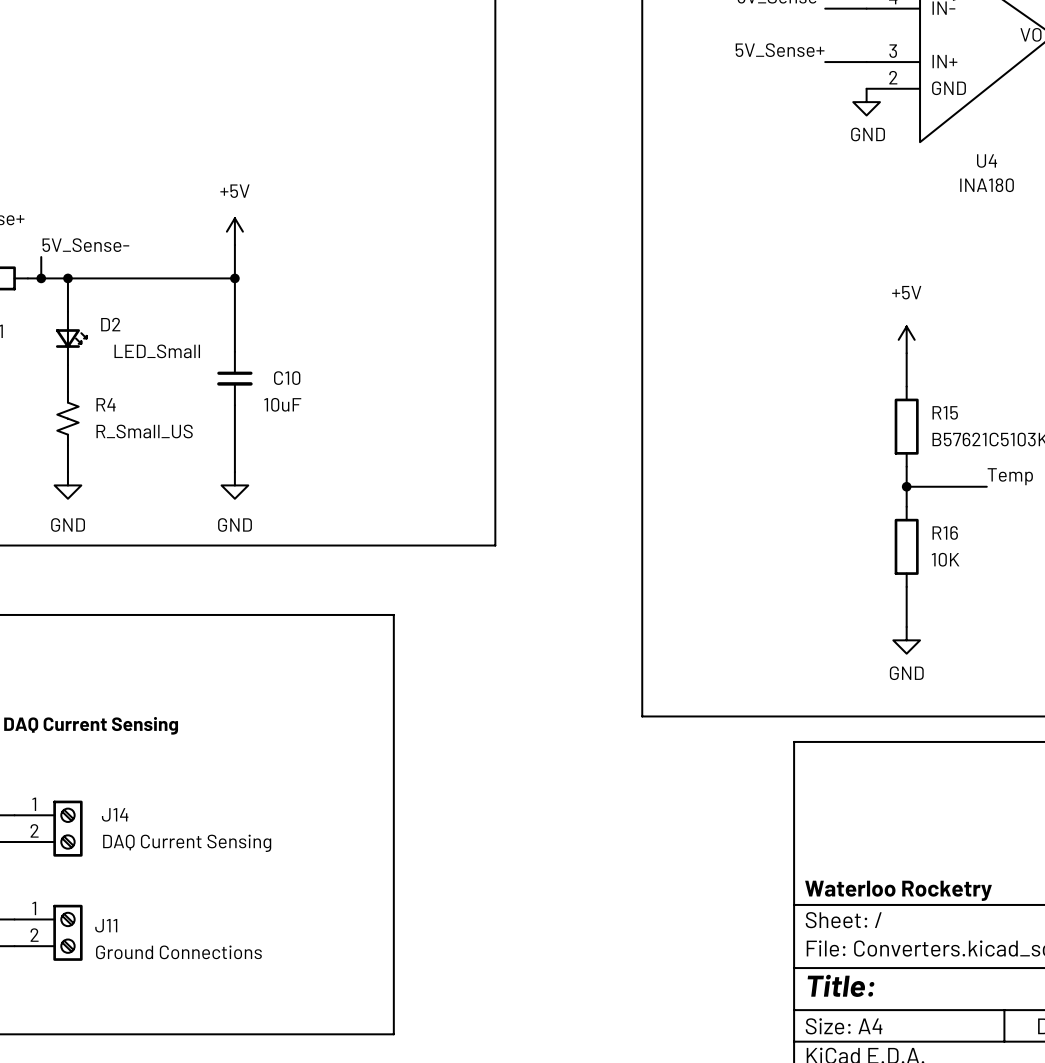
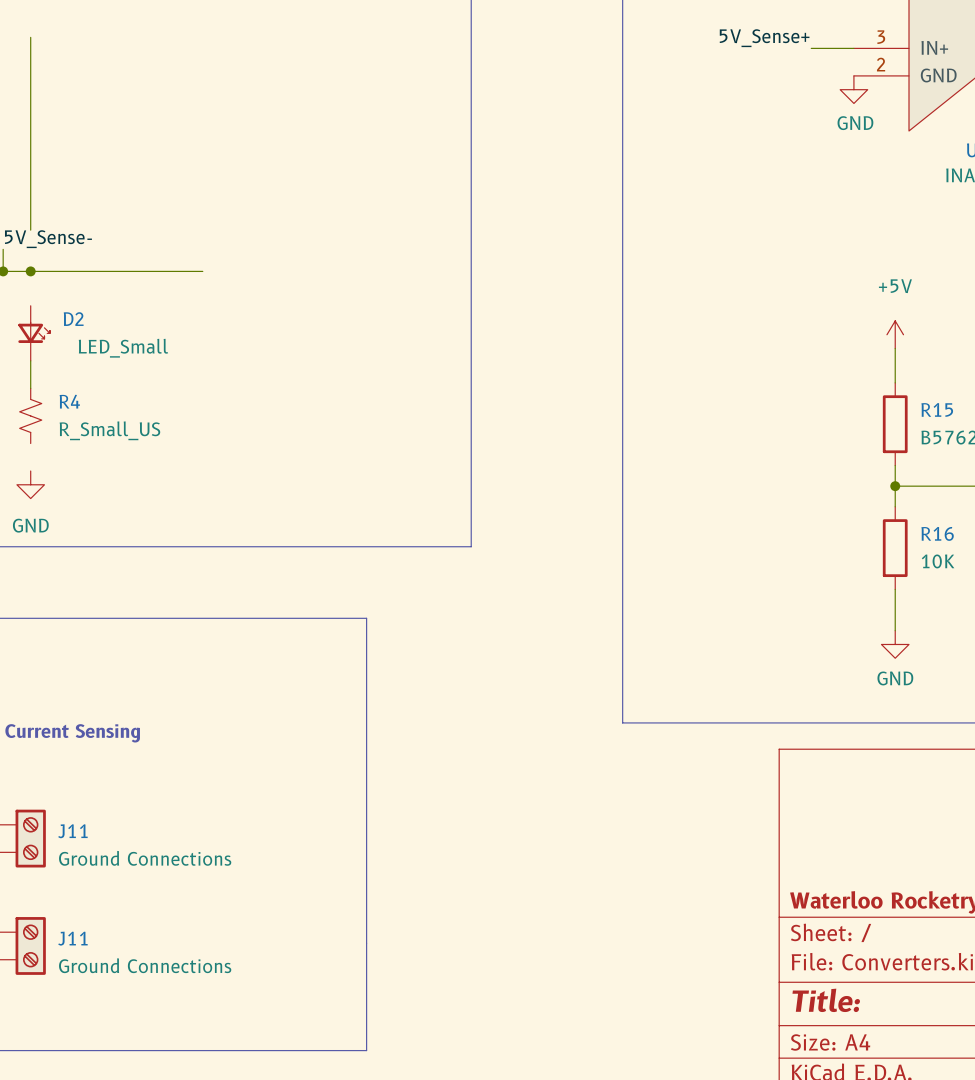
wire: none -> (30, 37) (30, 230)
power symbol: +5V (234, 231) -> none
wire: (234, 245) (234, 351) -> none
wire: (67, 278) (67, 311) -> none
junction: (234, 278) -> none
C10: 10uF (234, 378) -> none
wire: (234, 405) (234, 472) -> none
wire: (67, 445) (67, 472) -> none
power symbol: GND (234, 485) -> none
J14 name: J14 (115, 814) -> J11 (72, 831)
J14 value: DAQ Current Sensing (187, 843) -> Ground Connections (145, 858)

